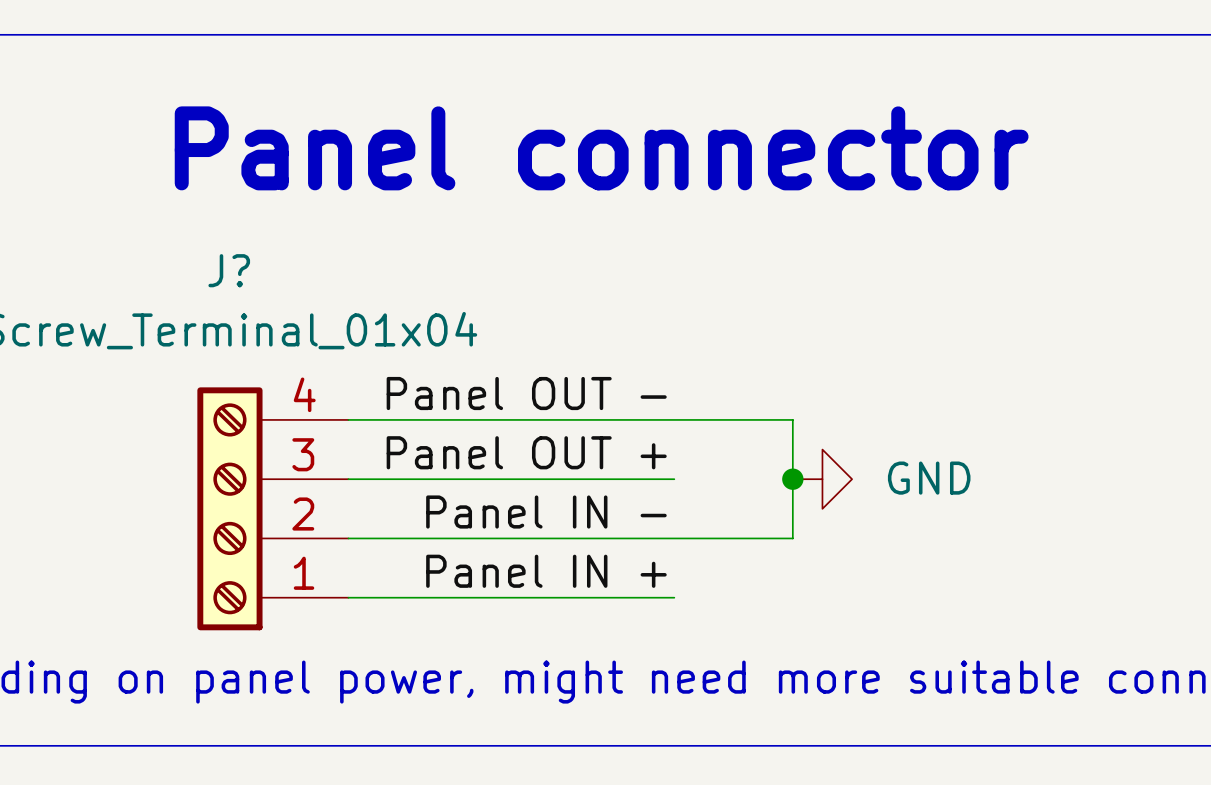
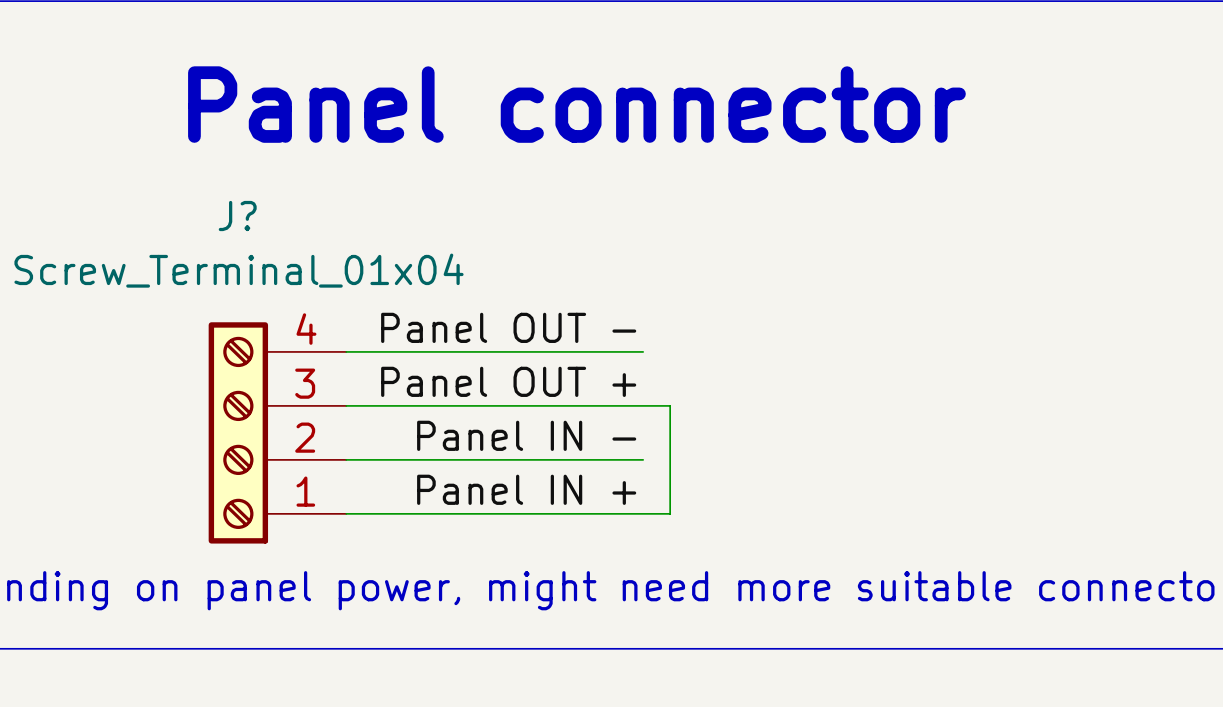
wire: (674, 419) (792, 419) (792, 538) (674, 538) -> none
wire: none -> (643, 405) (670, 405) (670, 513) (643, 513)
junction: (792, 479) -> none
power symbol: GND (822, 479) -> none

